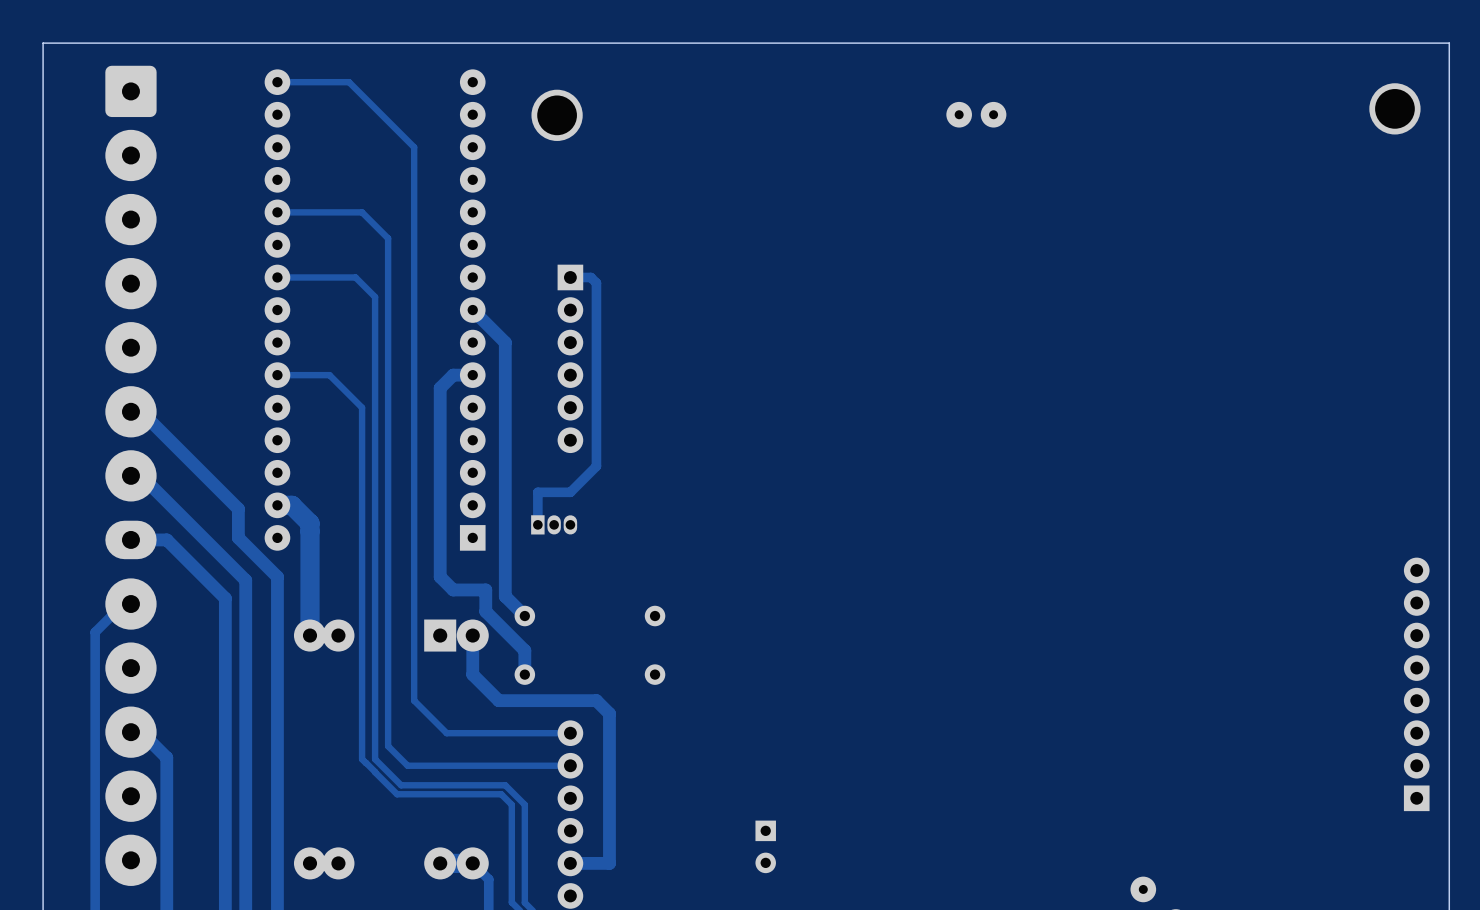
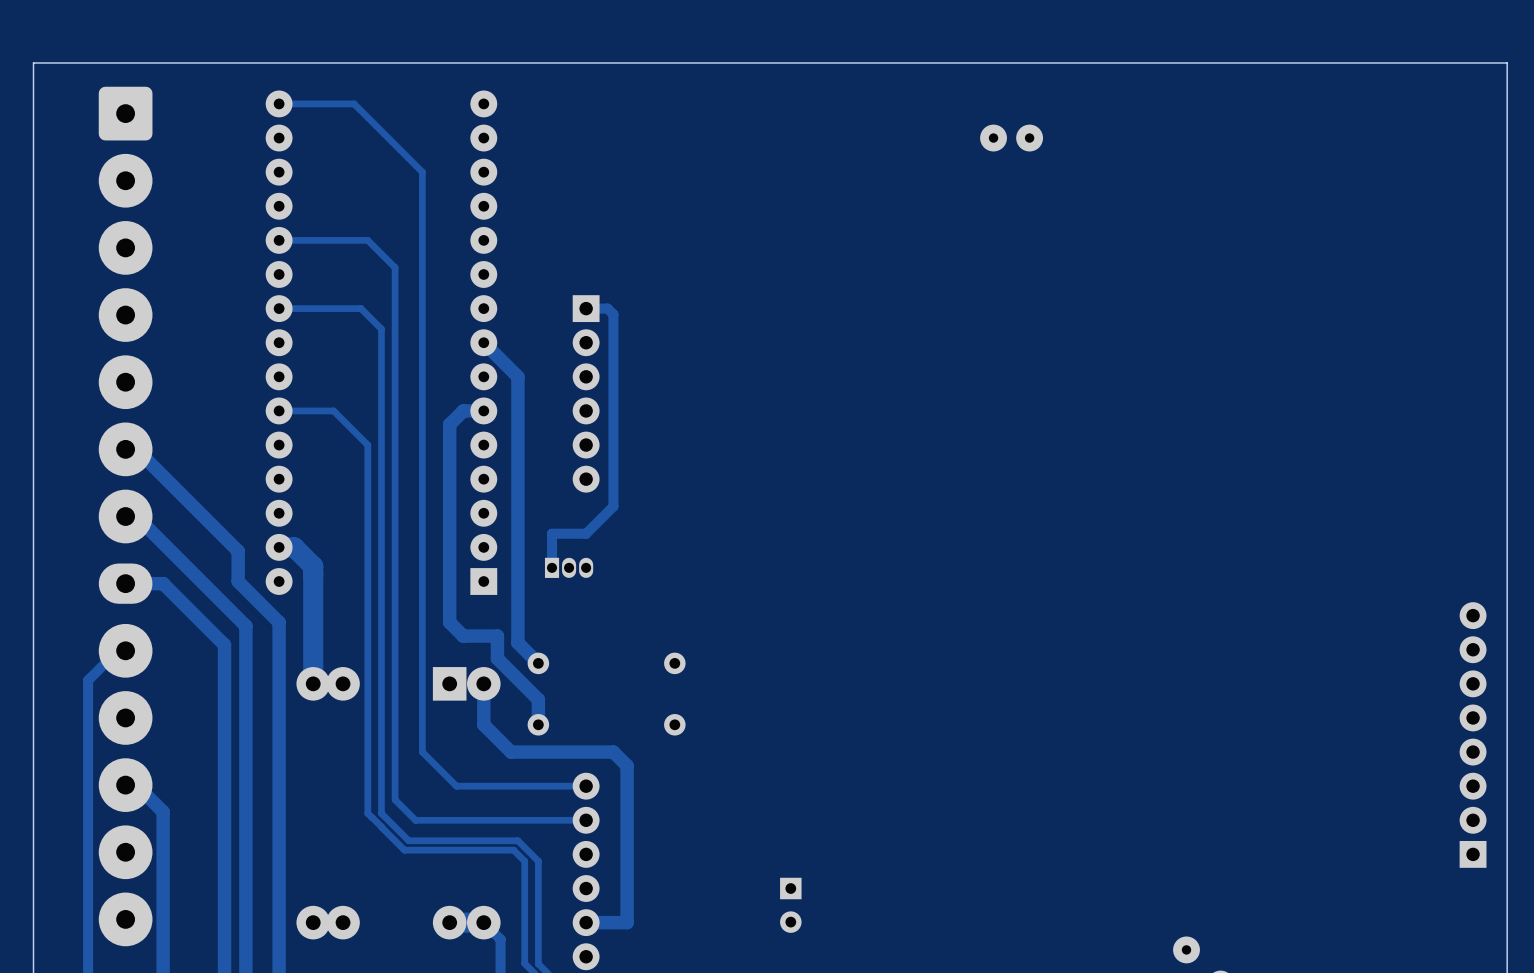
part: (1394, 108) -> none
part: (557, 115) -> none

